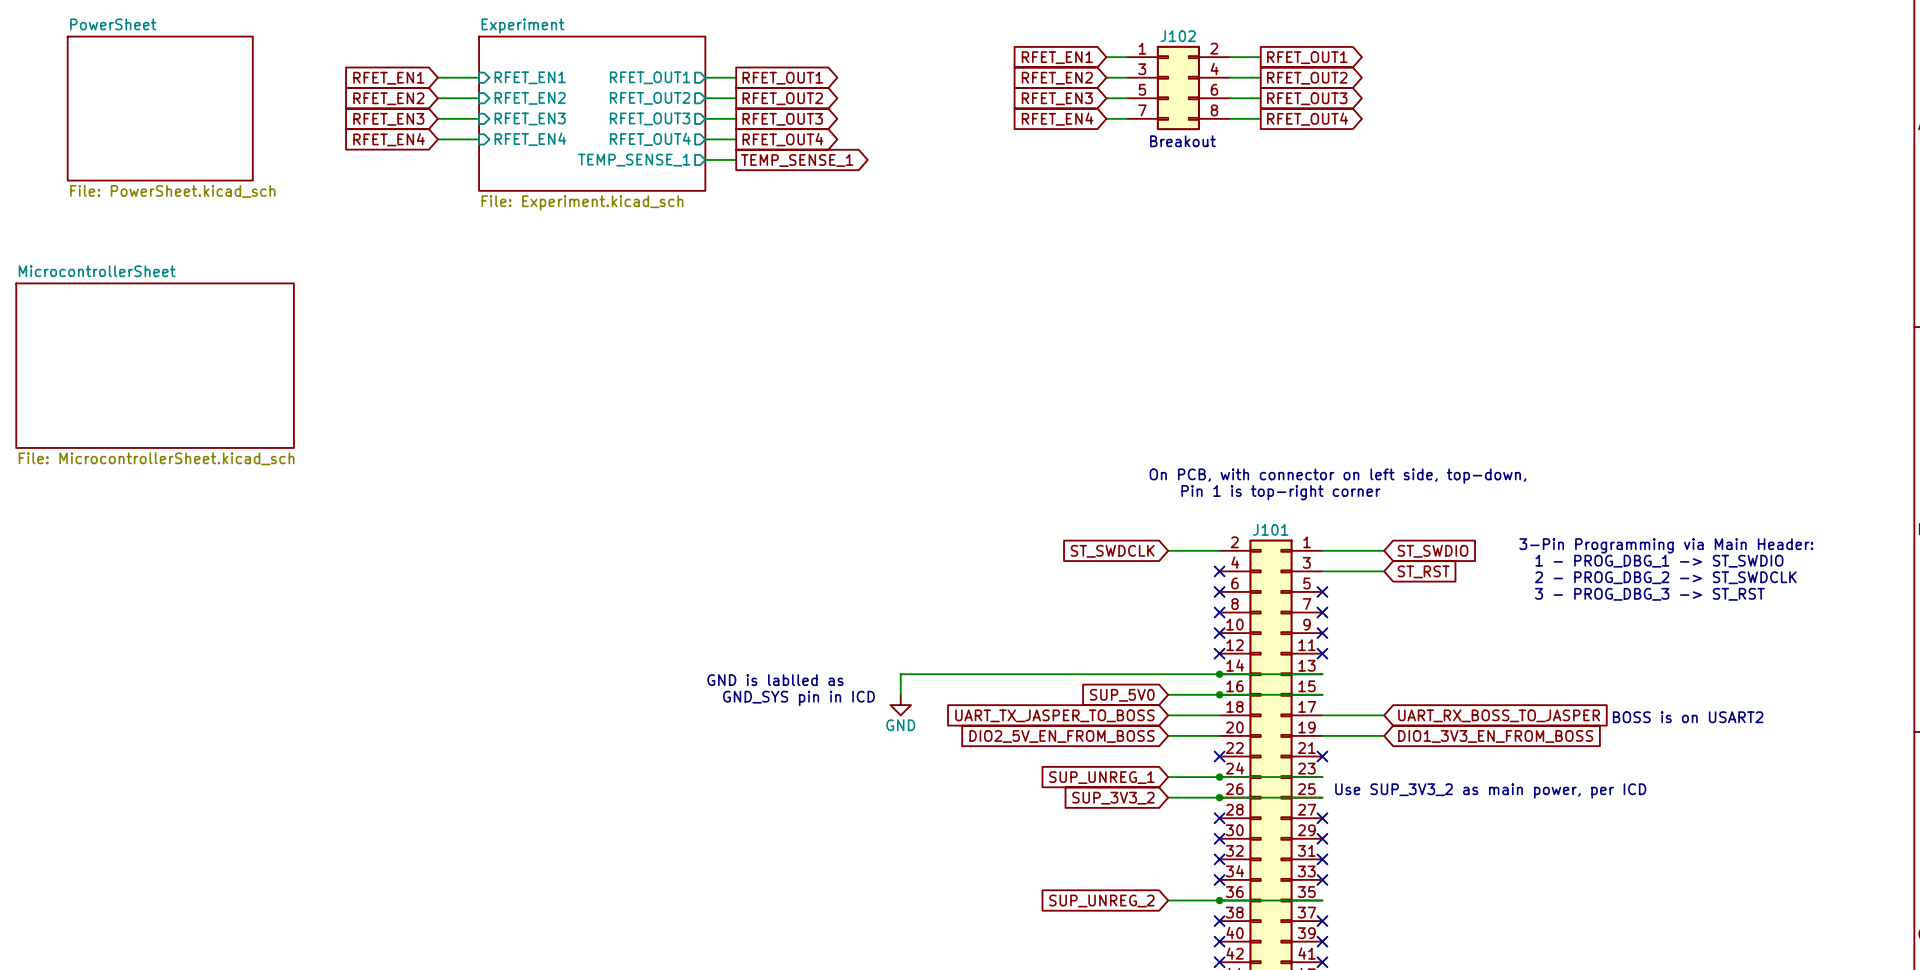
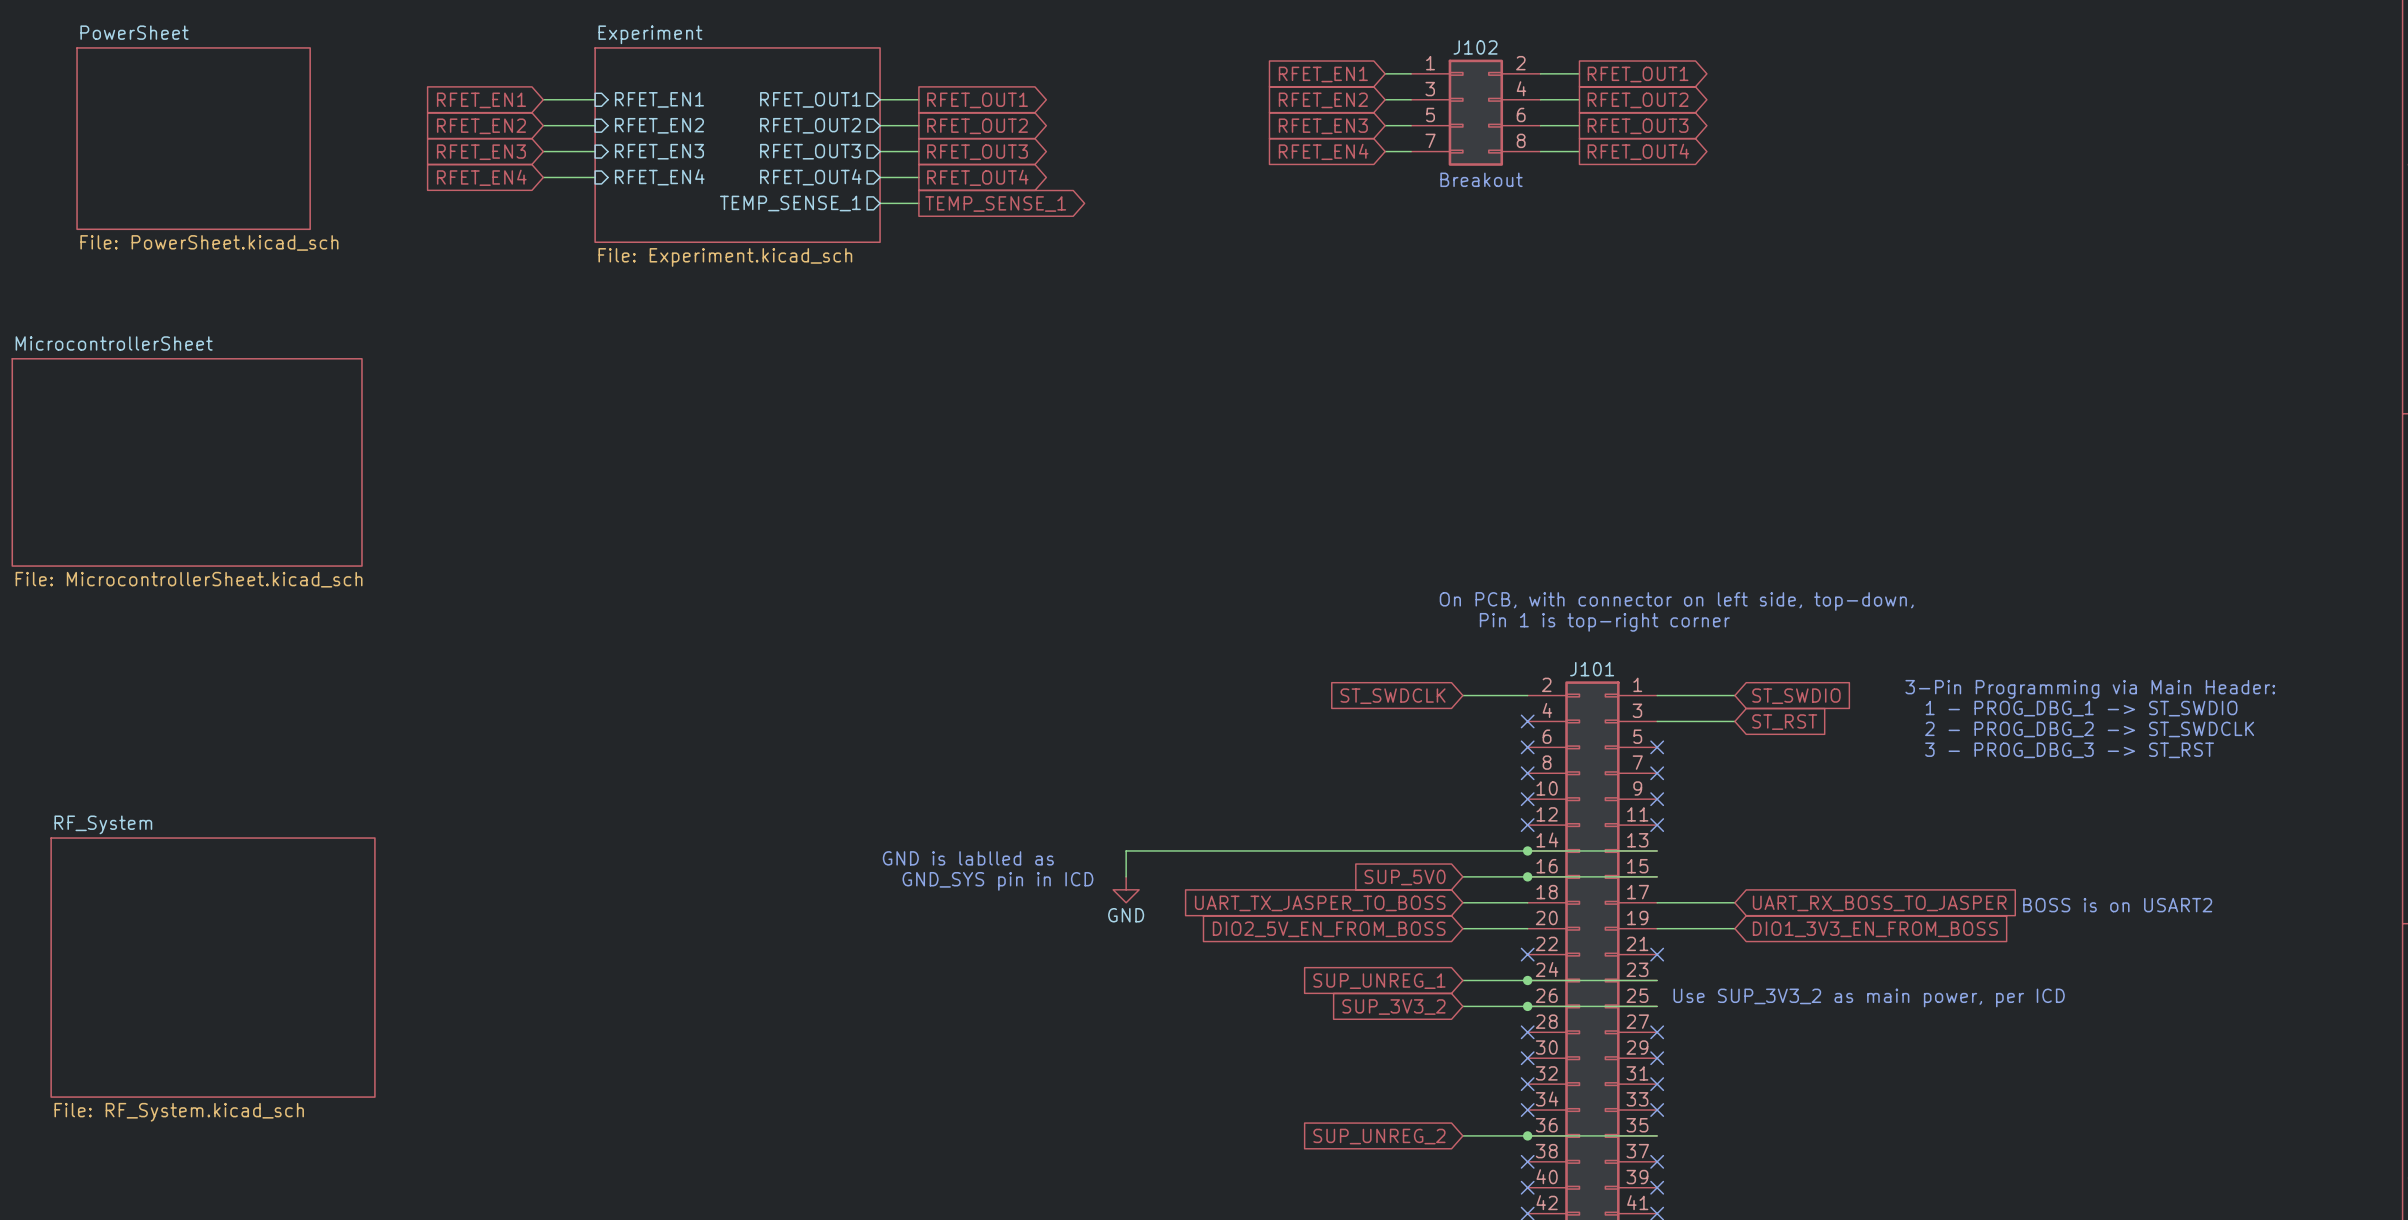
sheet RF_System: none -> File: RF_System.kicad_sch (213, 967)

